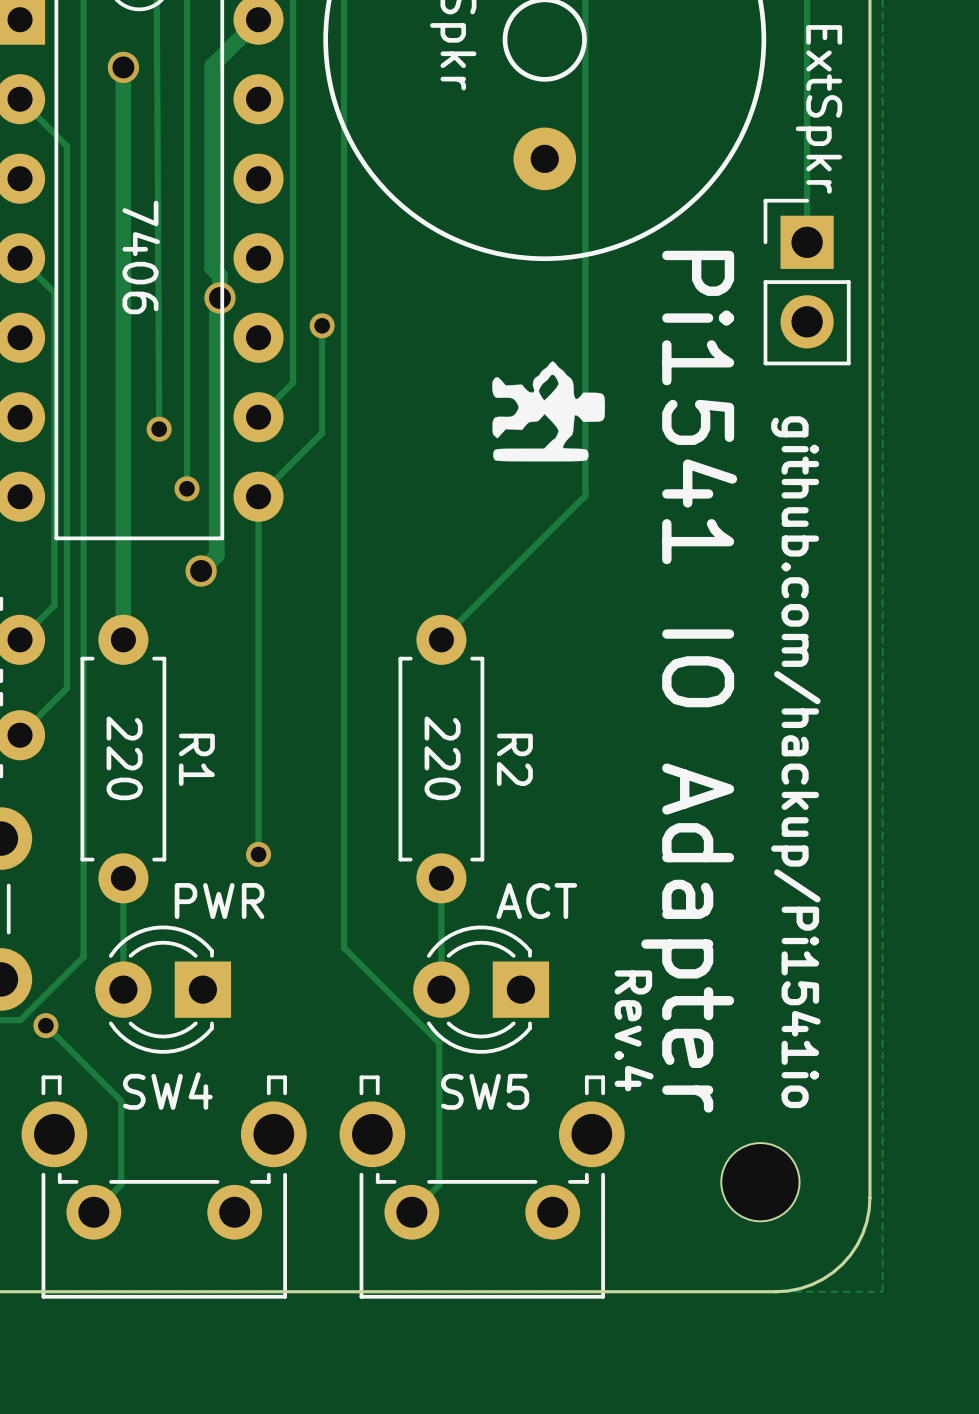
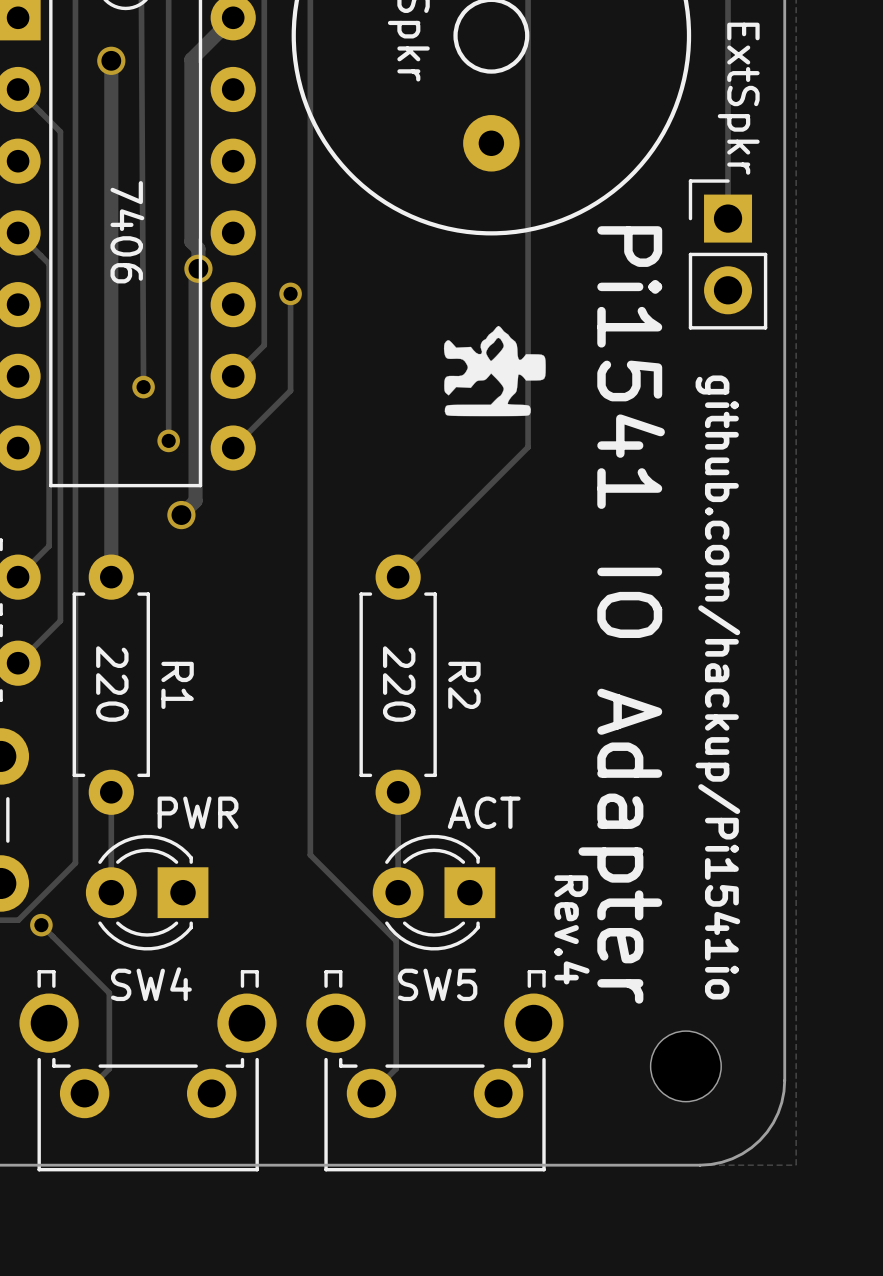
track: (258, 496) (258, 854) -> none
via: (258, 854) -> none

